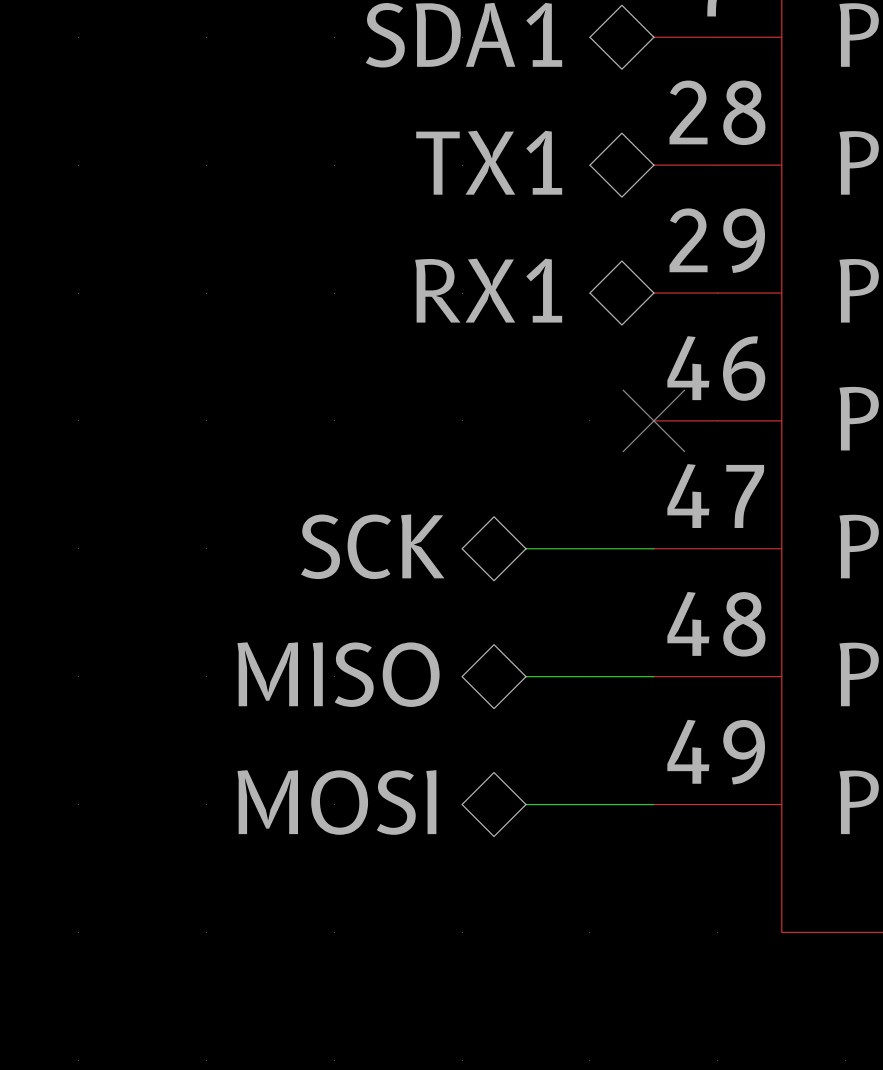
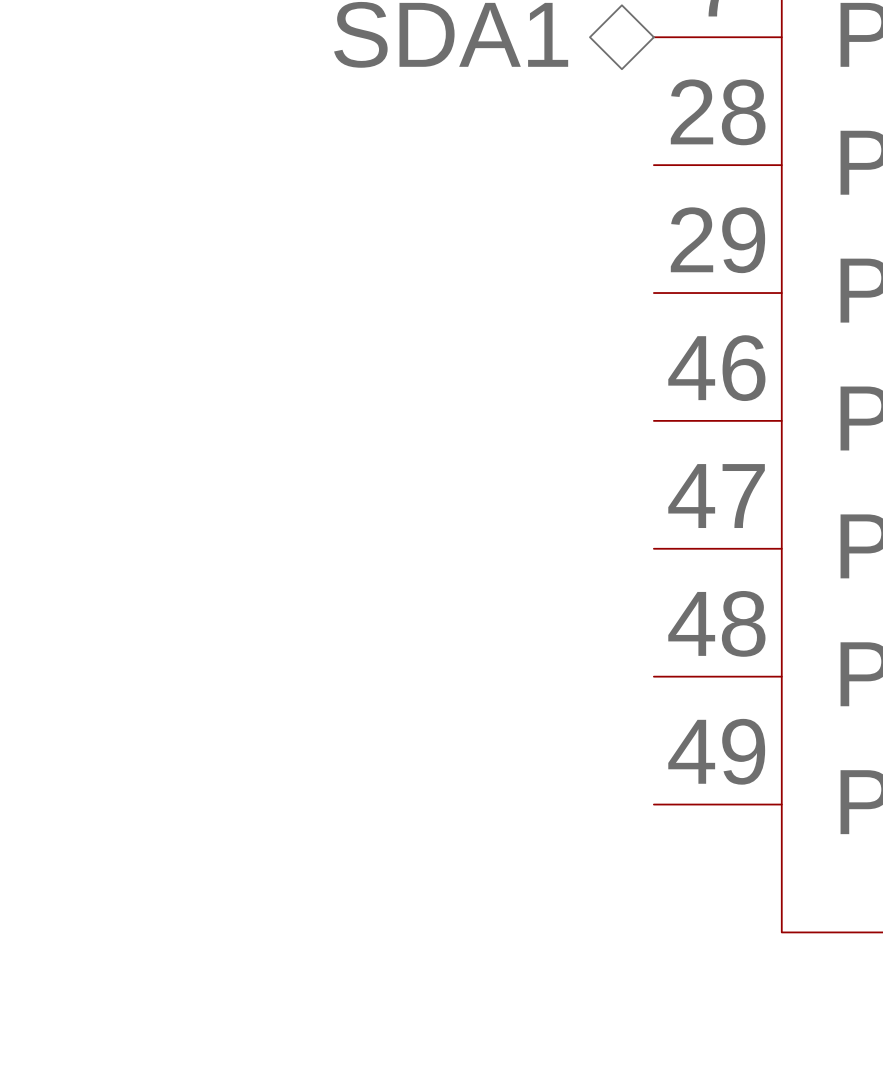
hierarchical label: TX1 (489, 162) -> none
hierarchical label: RX1 (488, 290) -> none
no-connect mark: (653, 420) -> none
hierarchical label: SCK (372, 546) -> none
wire: (526, 548) (653, 548) -> none
hierarchical label: MISO (338, 674) -> none
wire: (526, 676) (653, 676) -> none
hierarchical label: MOSI (336, 802) -> none
wire: (526, 804) (653, 804) -> none

